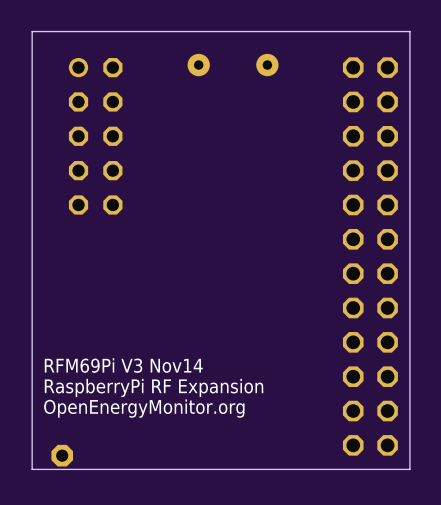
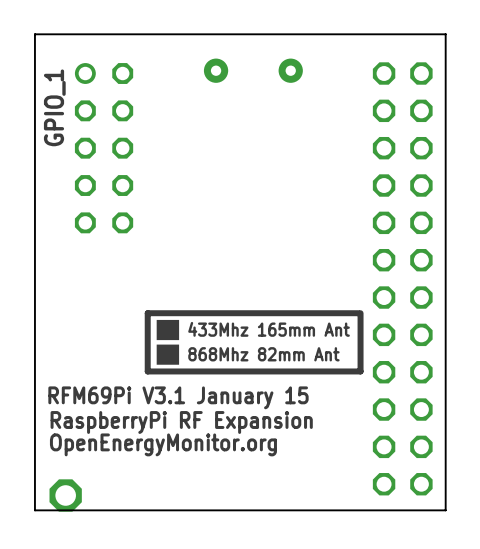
GPIO_1 name: none -> GPIO_1 (54, 107)
line: none -> (360, 313) (360, 371) (147, 371) (147, 313) (358, 313)
drawing: none -> [156, 319, 180, 365]
text: none -> 433Mhz 165mm Ant (269, 329)
text: none -> 868Mhz 82mm Ant (263, 354)
text: RFM69Pi V3 Nov14 (123, 365) -> RFM69Pi V3.1 January 15 (178, 397)
part footprint: [51, 444, 74, 467] -> [49, 479, 82, 512]

